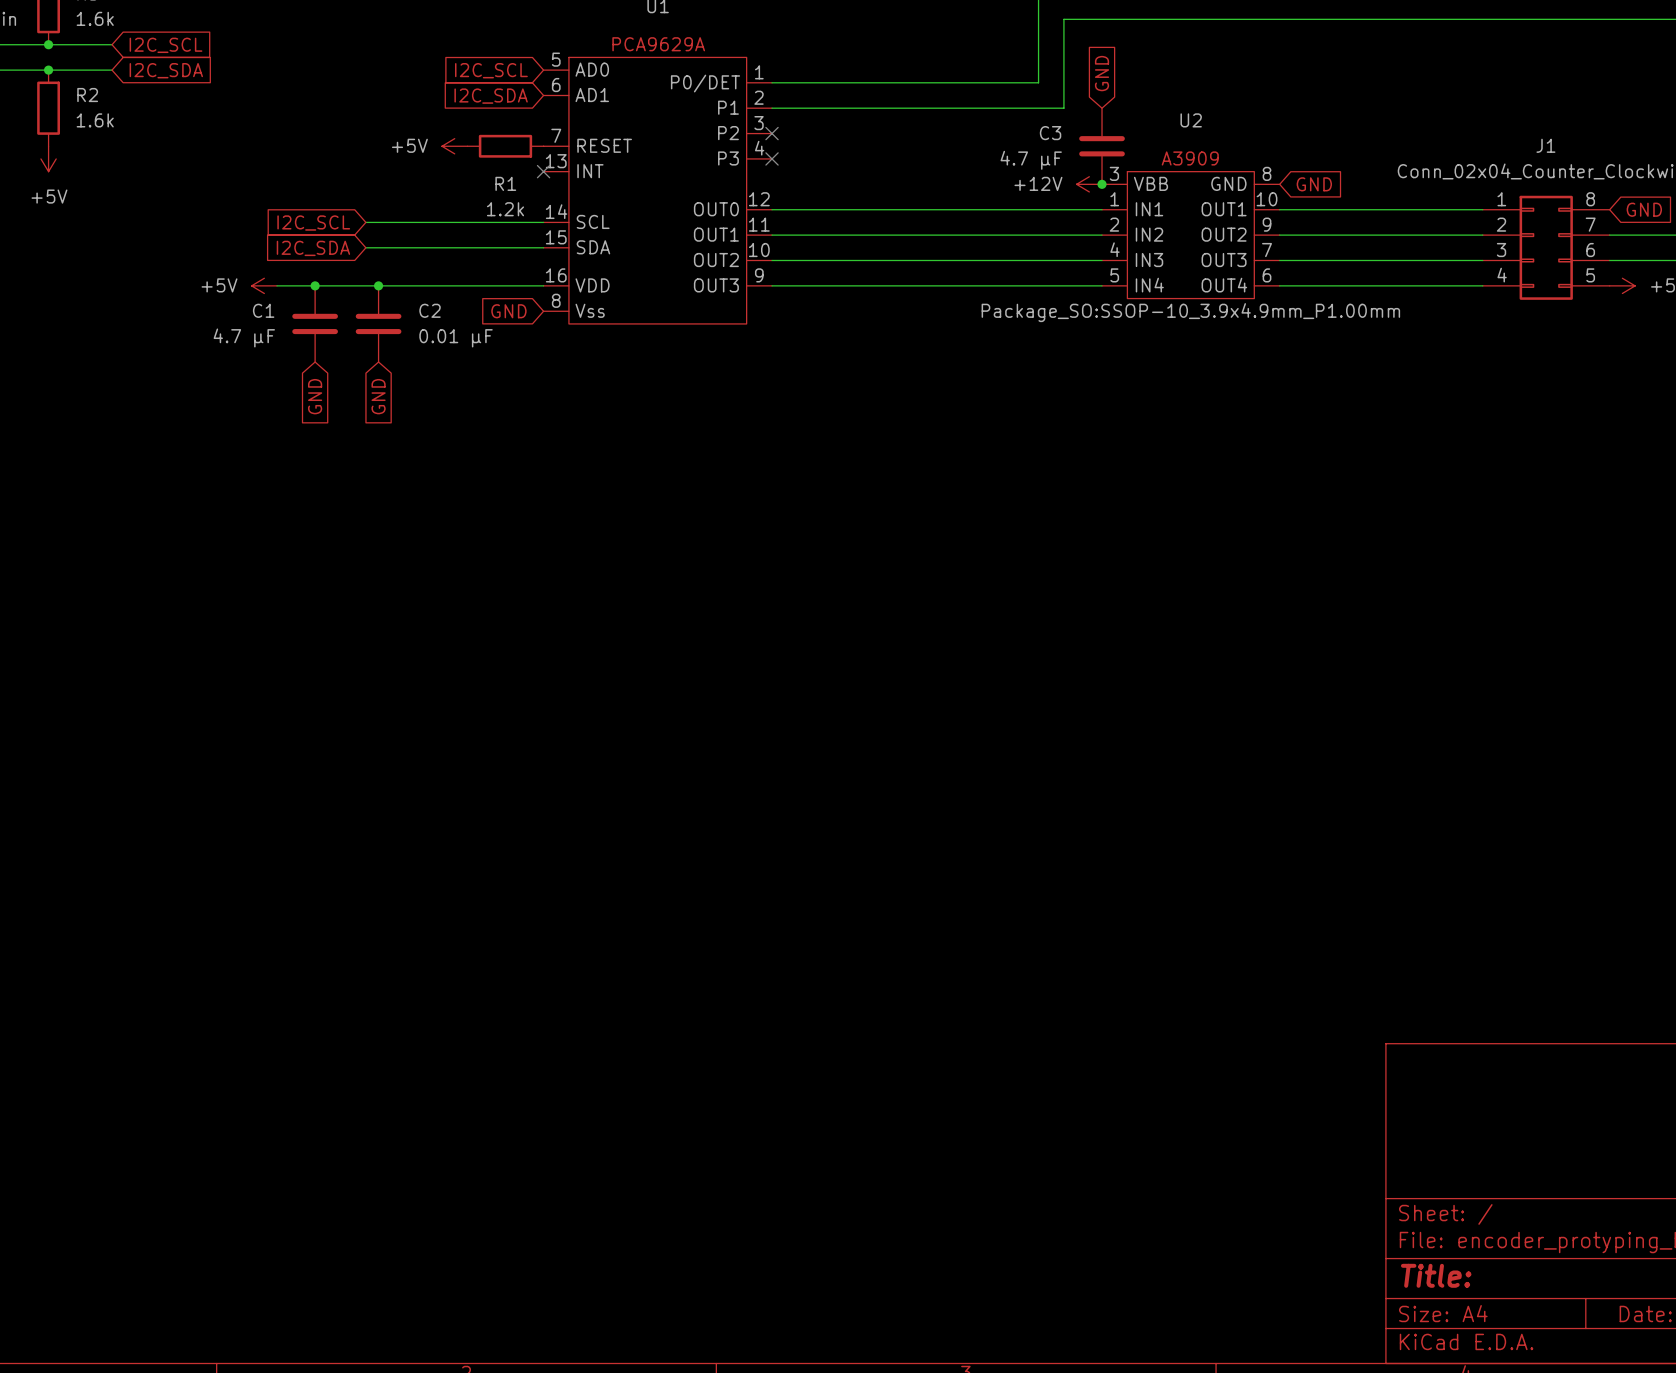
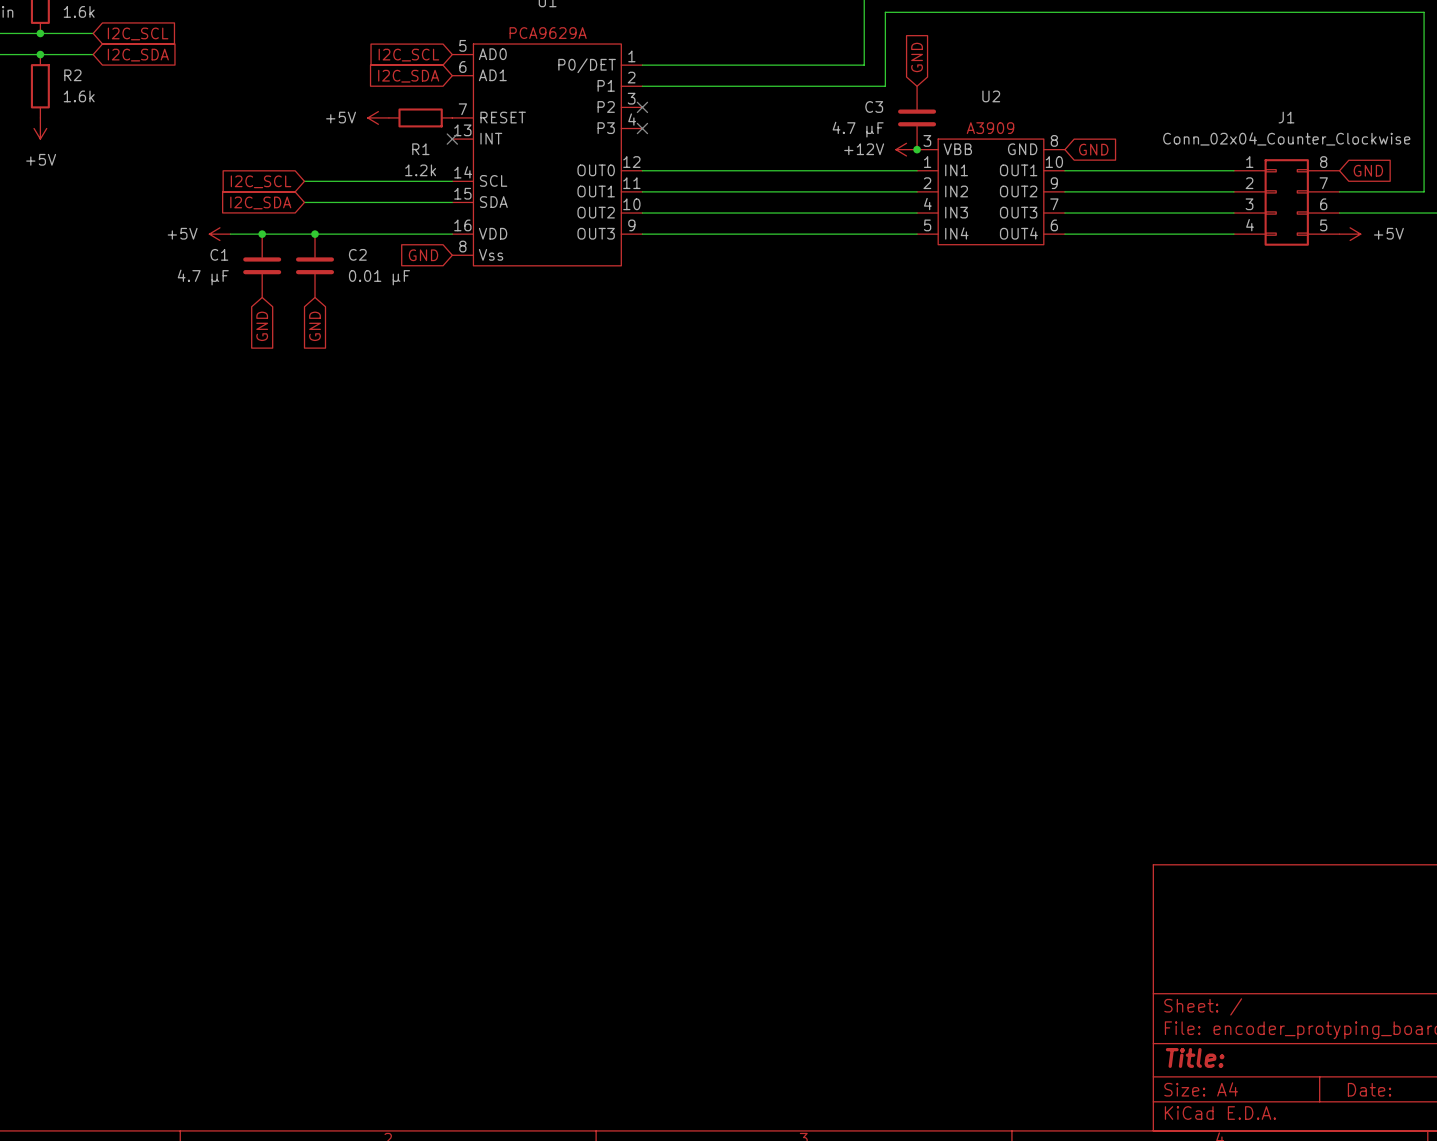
U2 text: Package_SO:SSOP-10_3.9x4.9mm_P1.00mm (1190, 312) -> none

